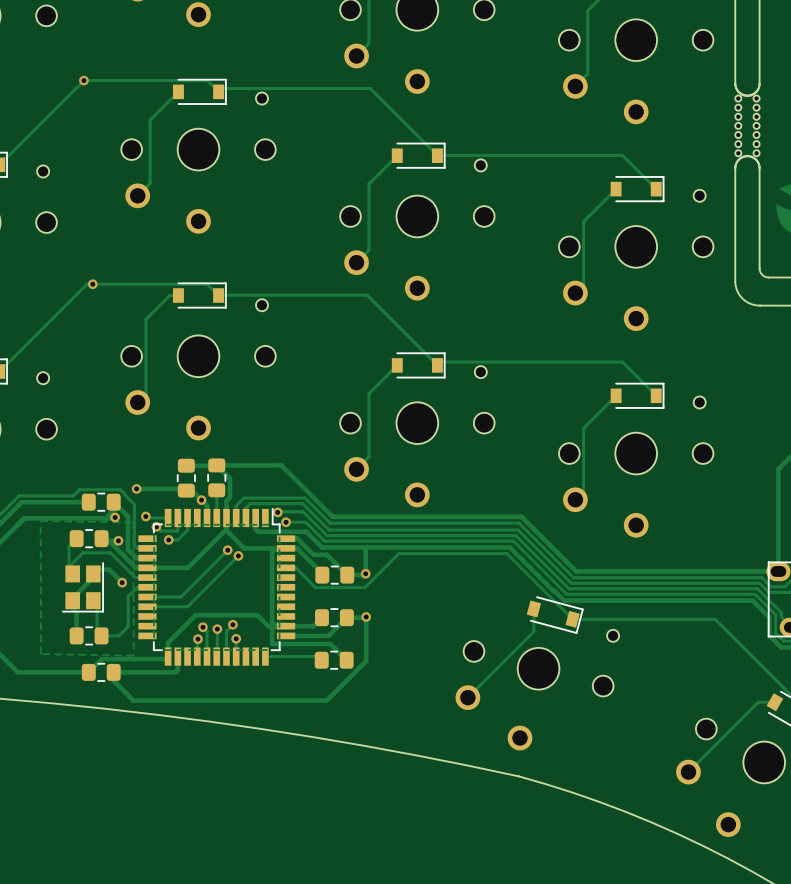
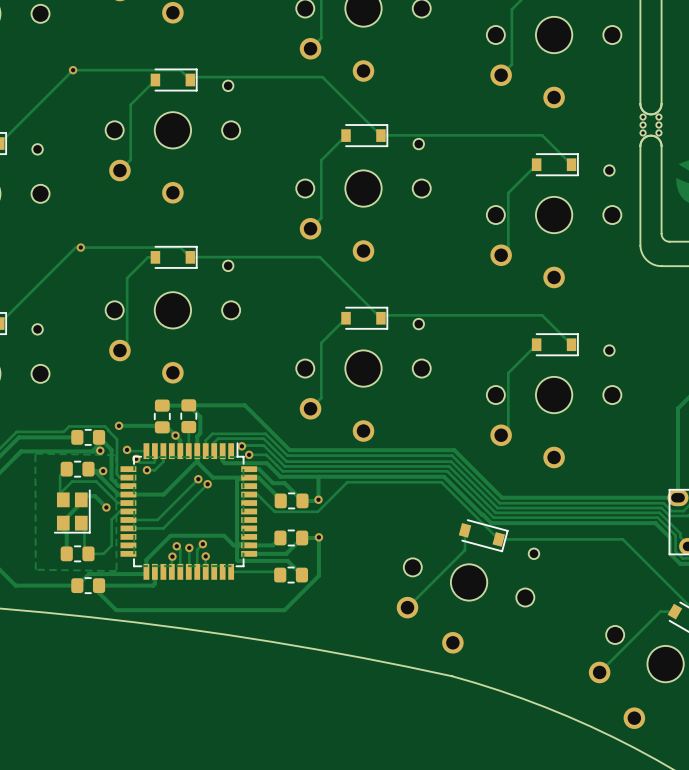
board edge: (735, 83) (738, 92) (747, 96) (756, 92) (759, 83) -> (640, 73) (640, 106) (644, 112) (650, 114) (657, 112) (661, 106) (661, 73)
part: (747, 125) -> none
part: none -> (650, 125)

